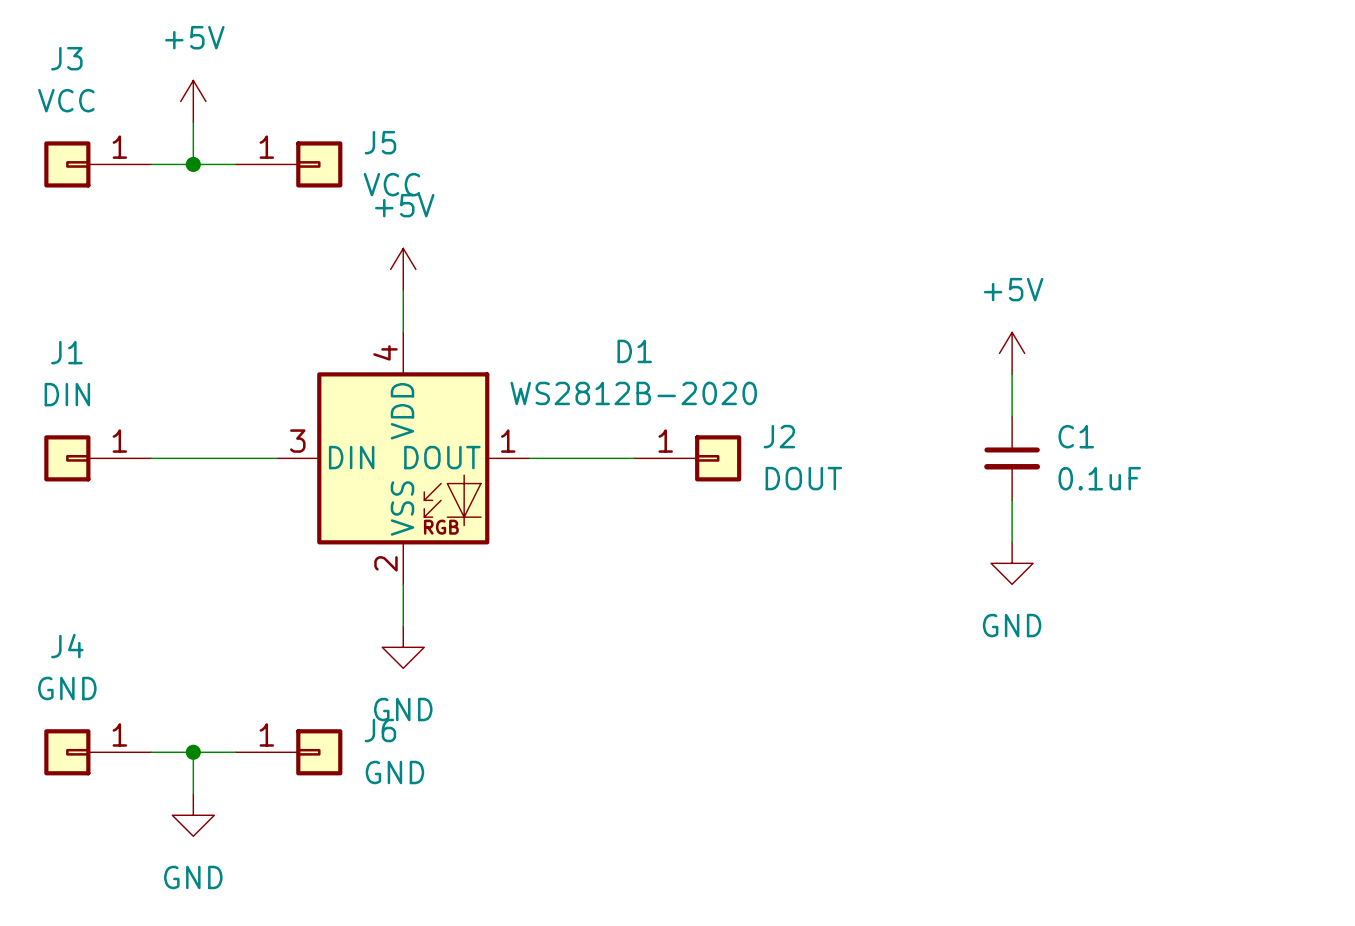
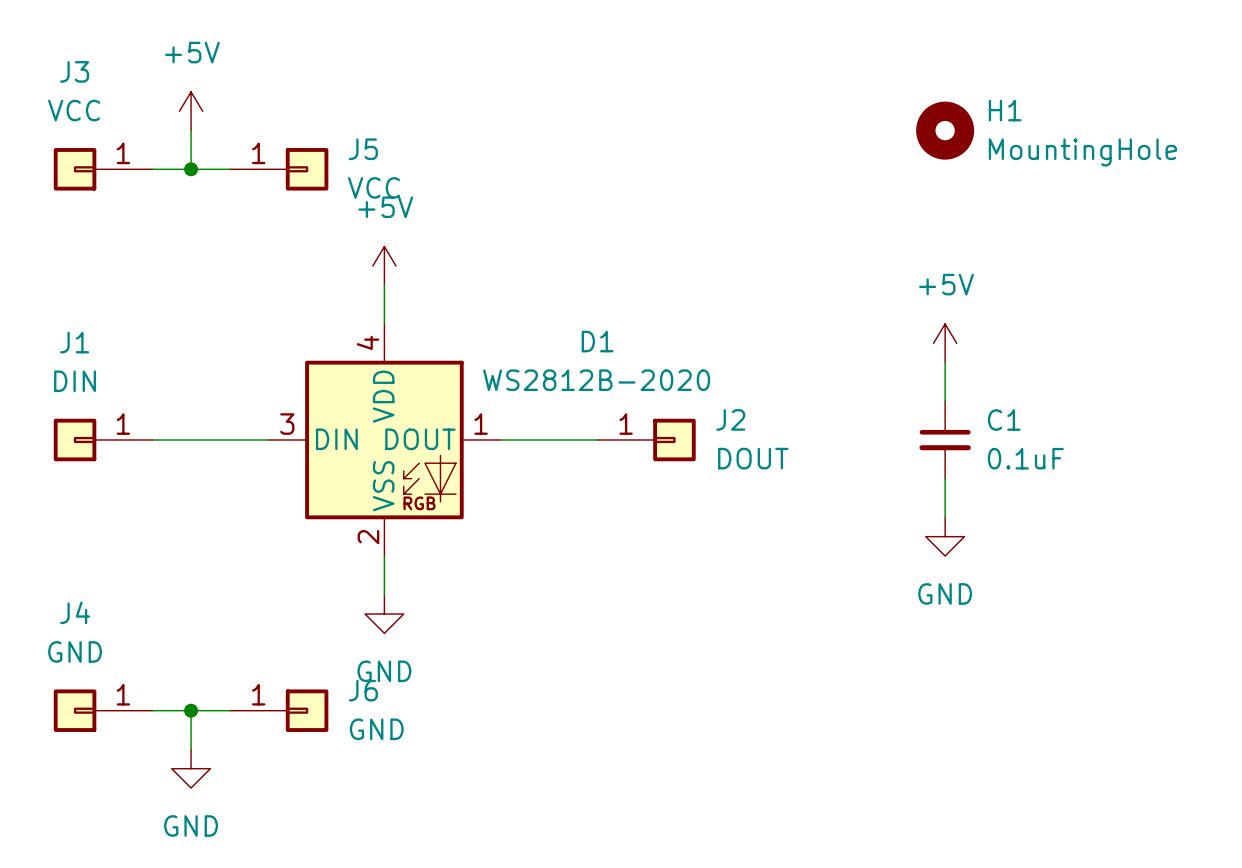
H1: none -> MountingHole (945, 130)

